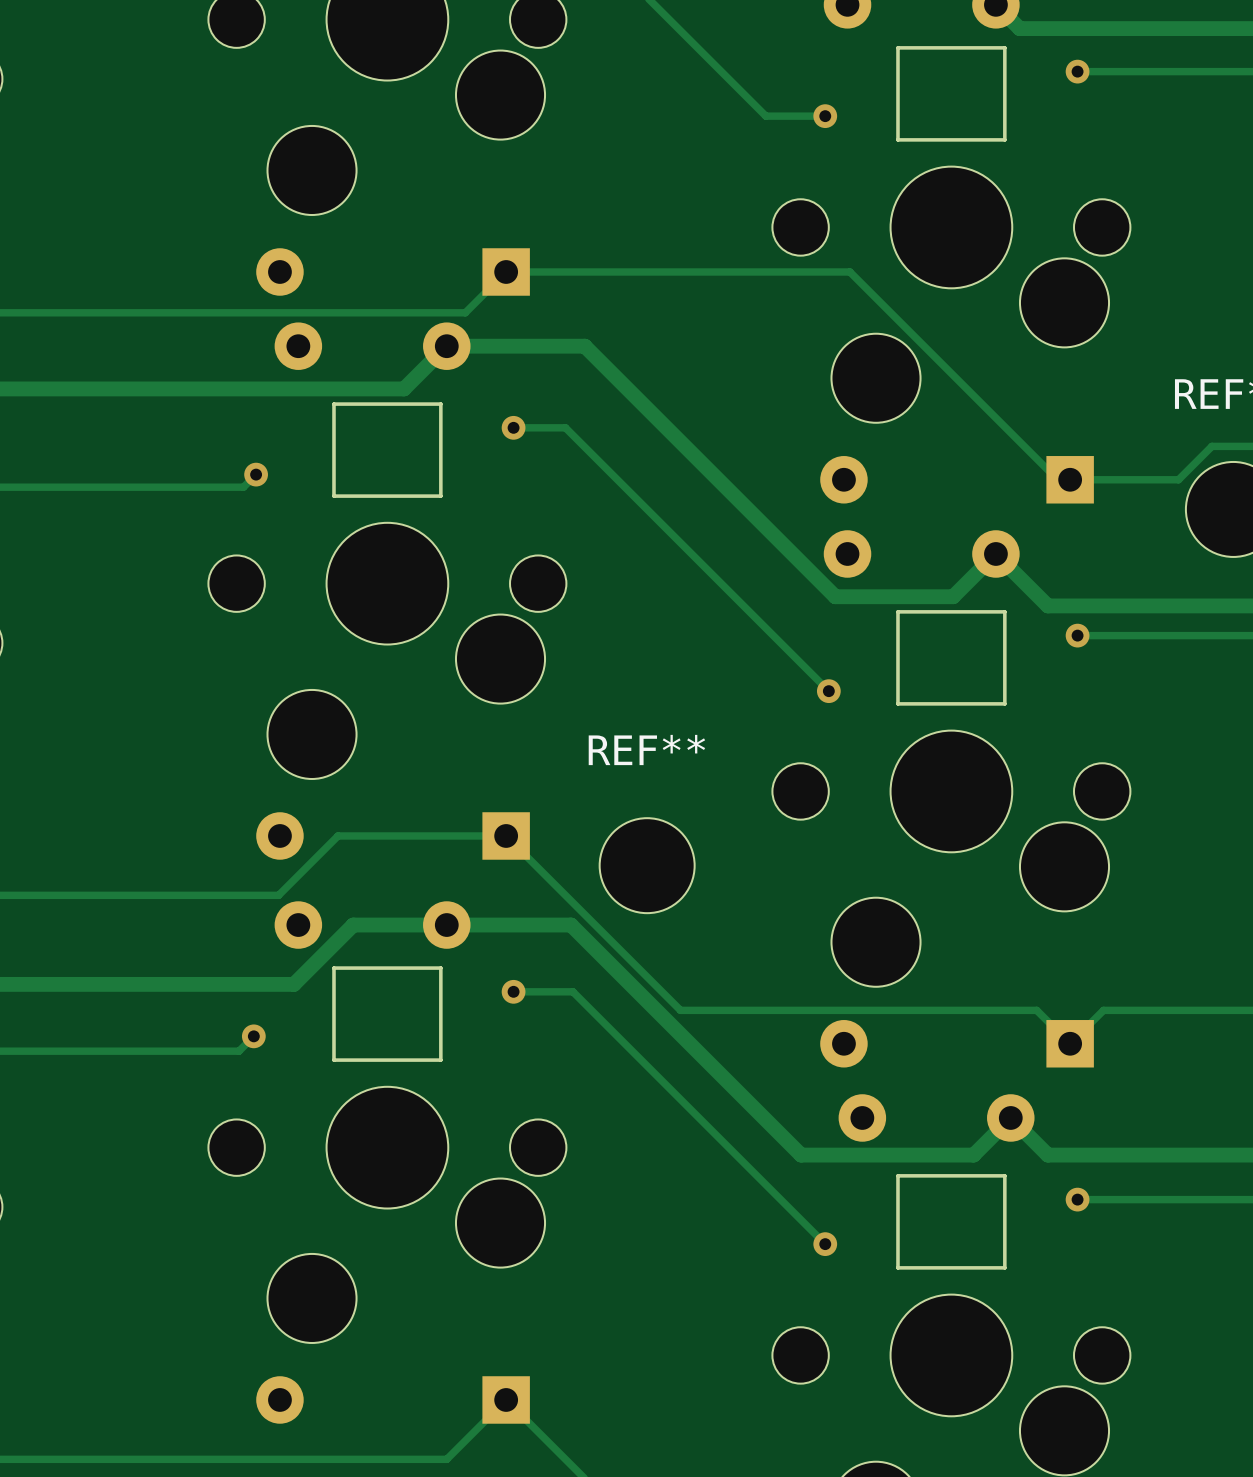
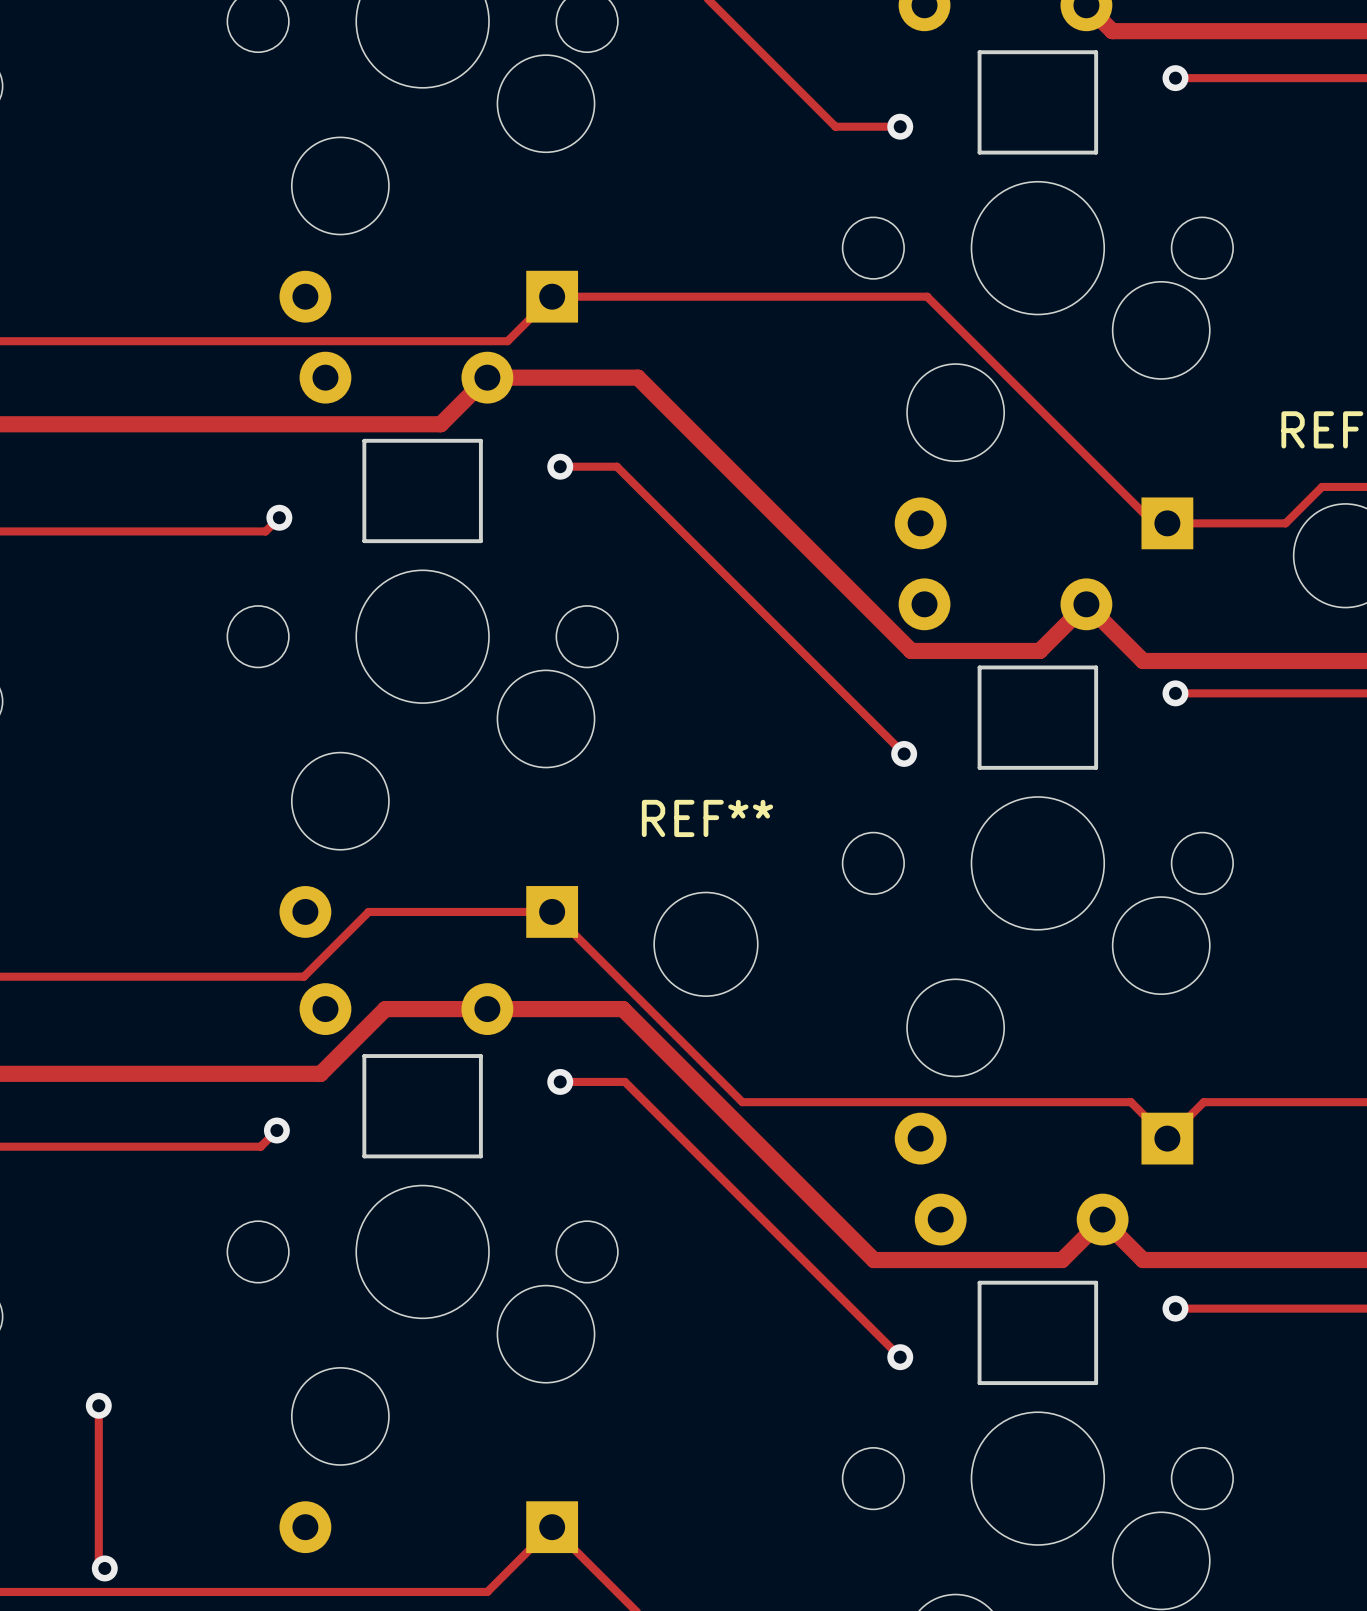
track: none -> (98, 1405) (98, 1562) (104, 1568)
via: none -> (98, 1405)
via: none -> (104, 1568)

